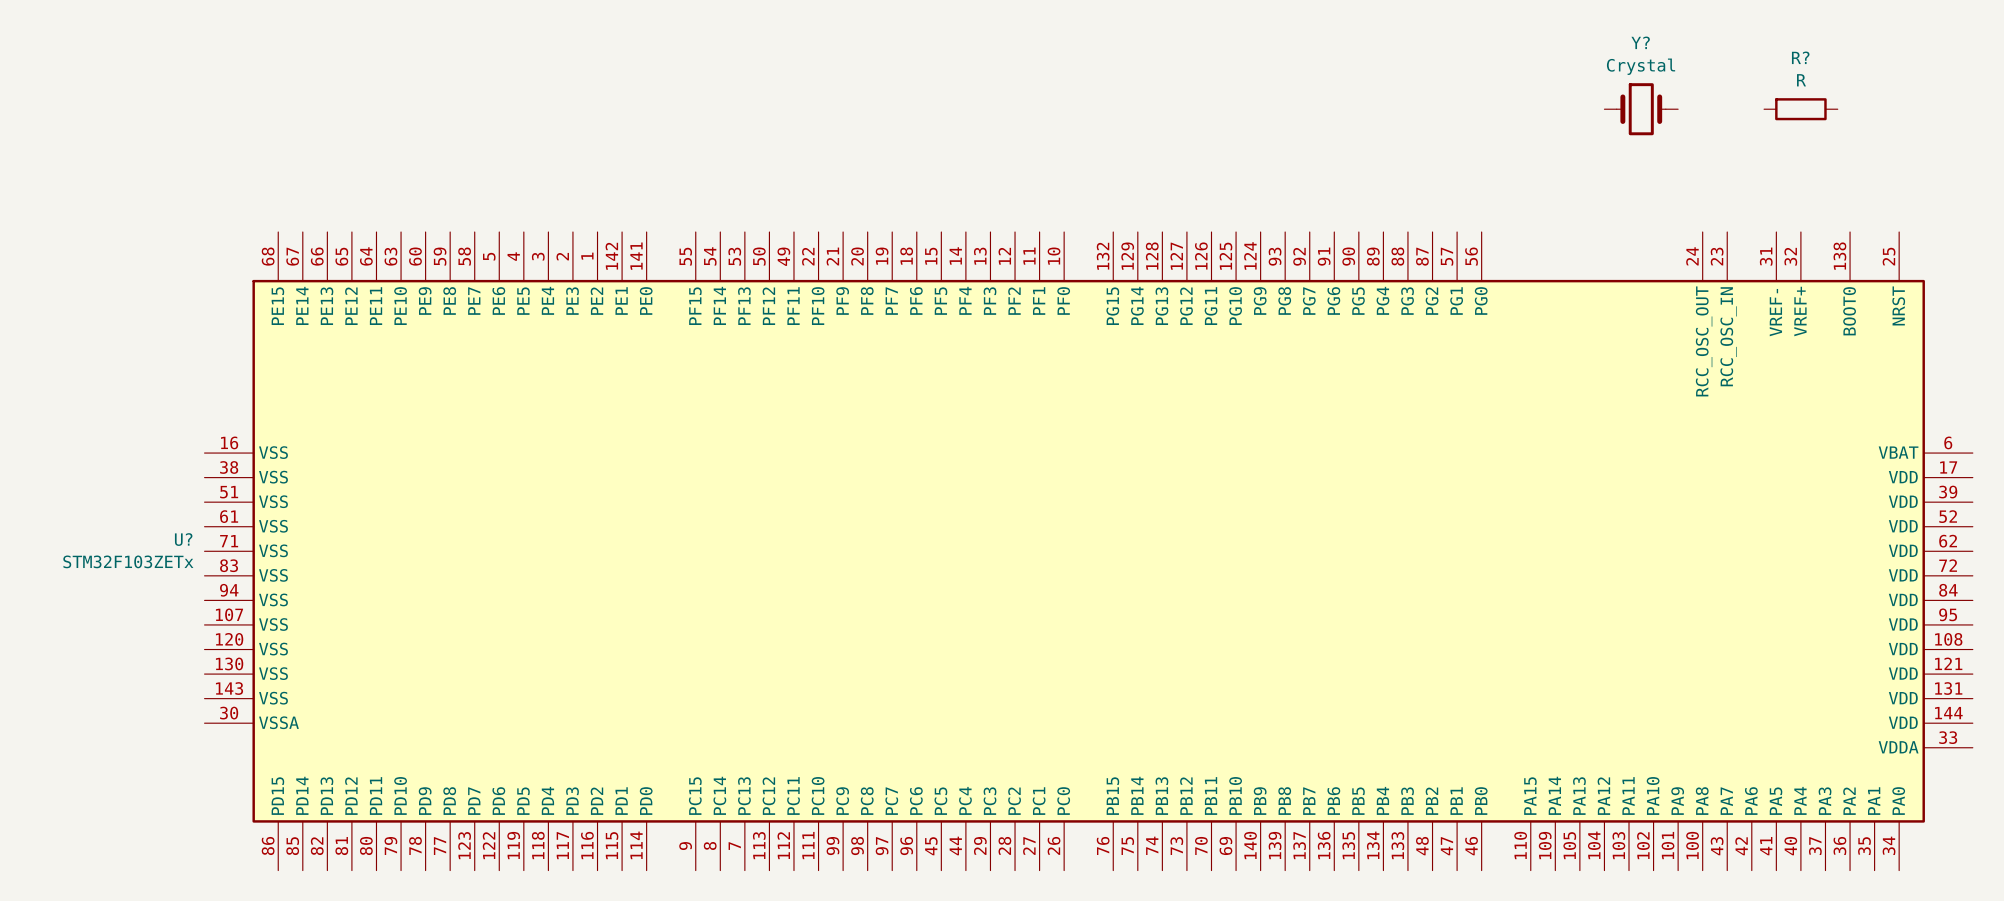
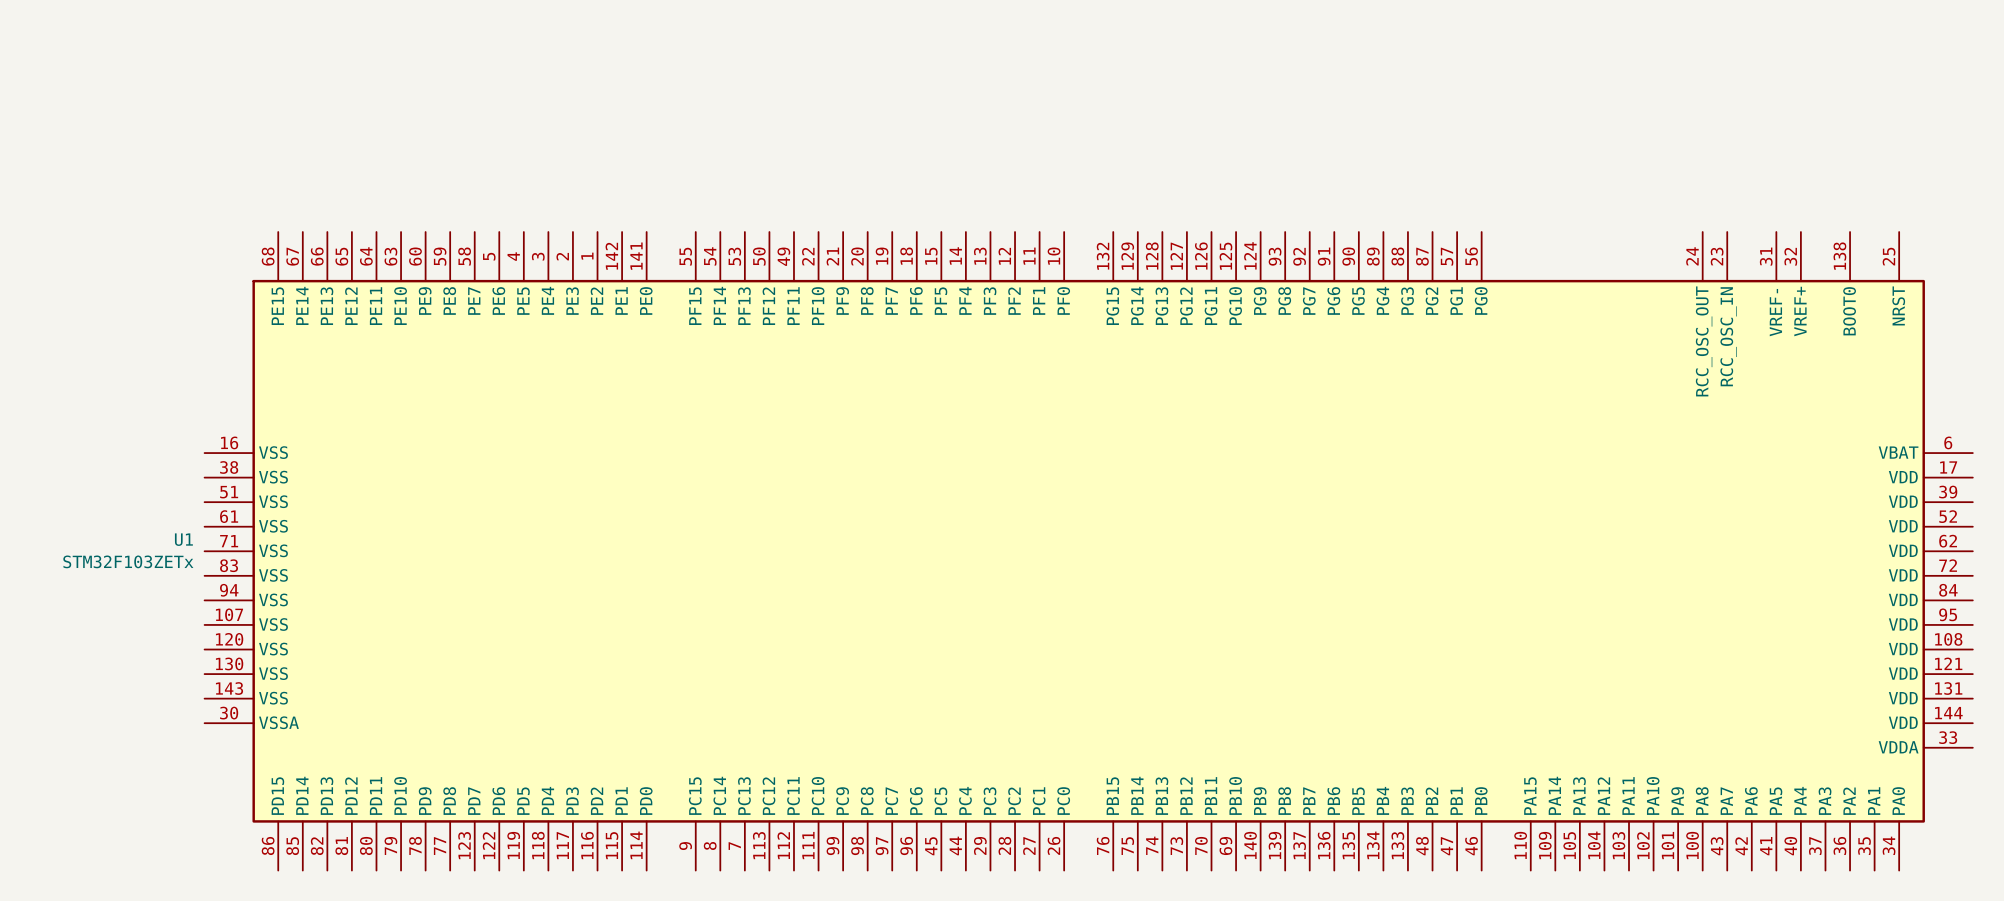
Y?: Crystal (1641, 109) -> none
R?: R (1800, 109) -> none
U? name: U? (183, 539) -> U1 (183, 539)

